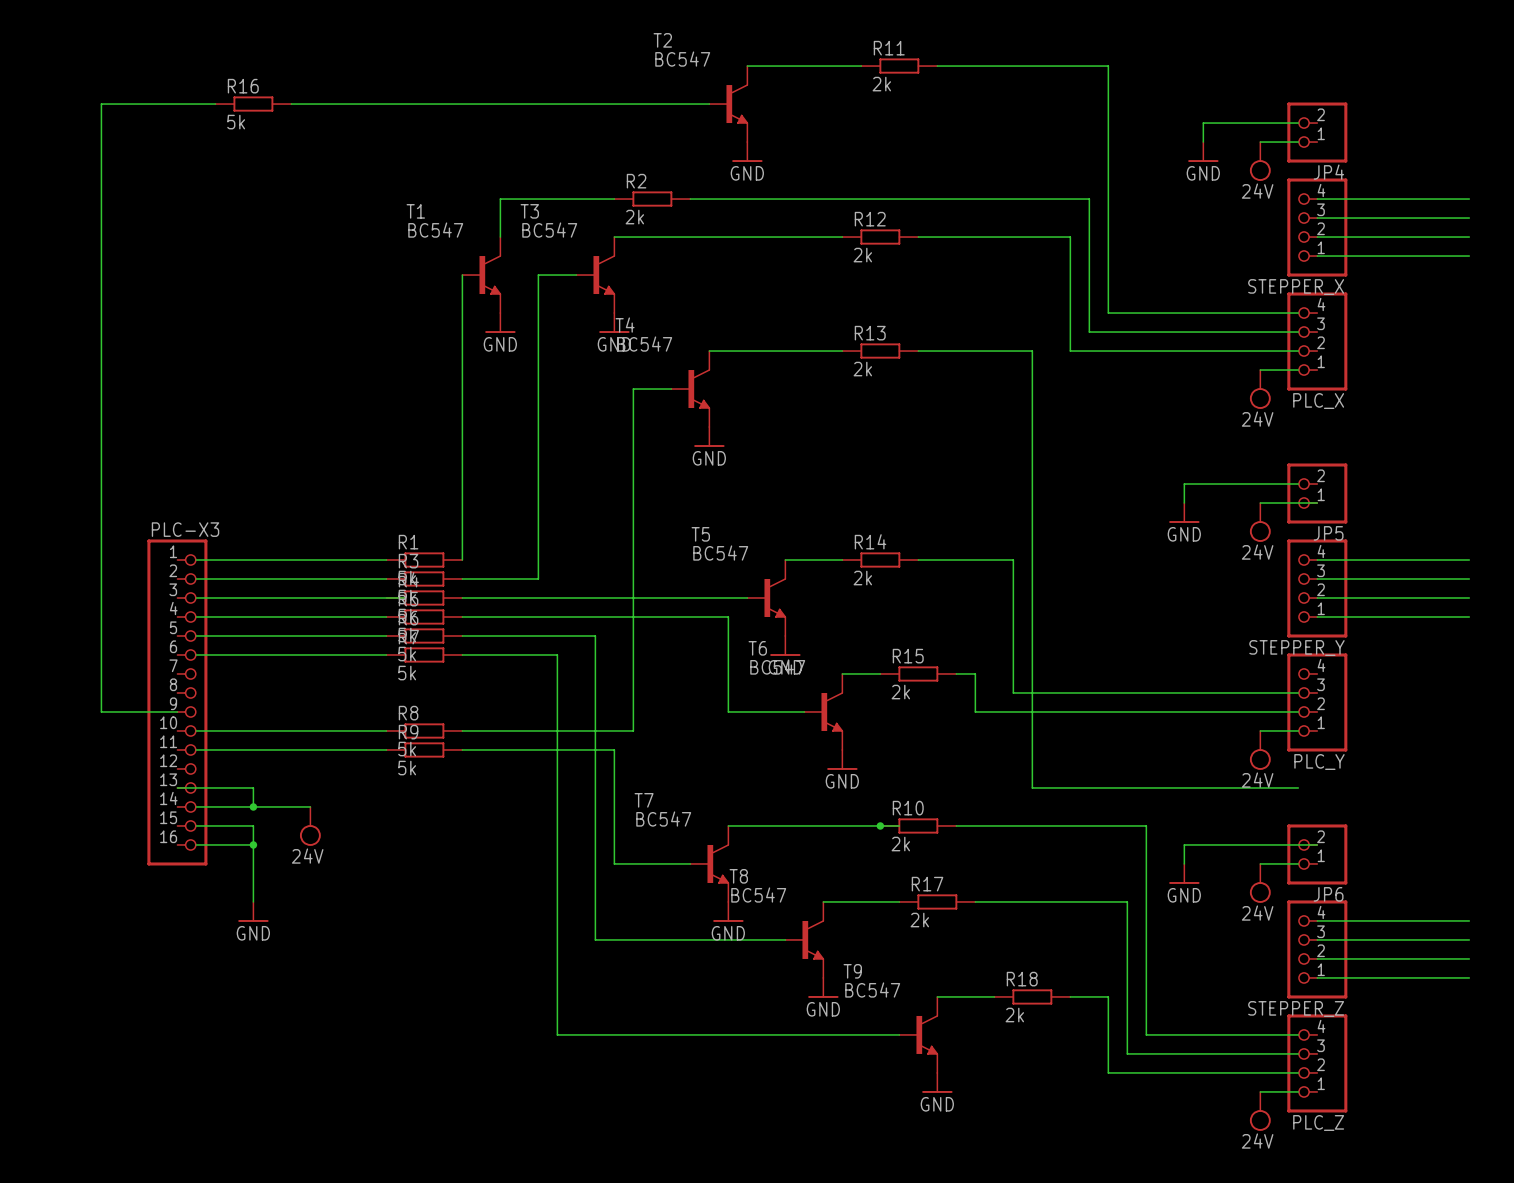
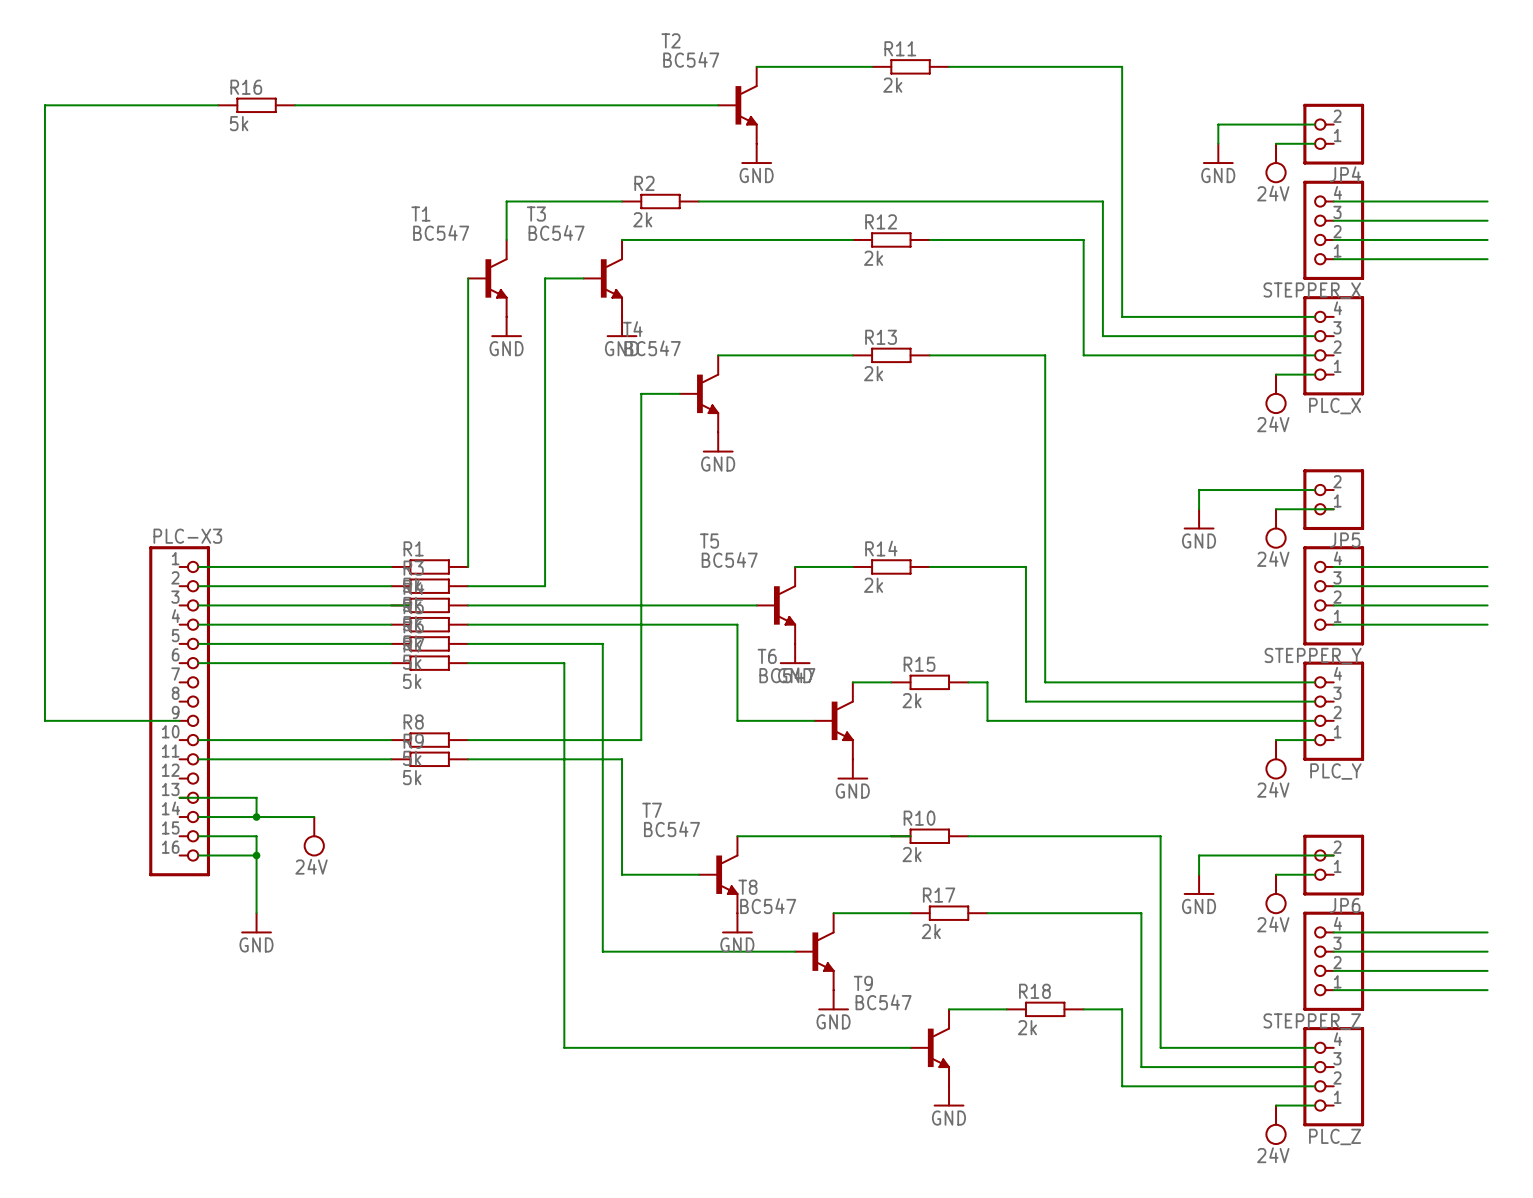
wire: (101, 104) (101, 711) -> (102, 105) (44, 105) (44, 720) (102, 720)
wire: (1032, 673) (1032, 787) (1298, 787) -> (1045, 682) (1314, 682)
junction: (880, 825) -> none

